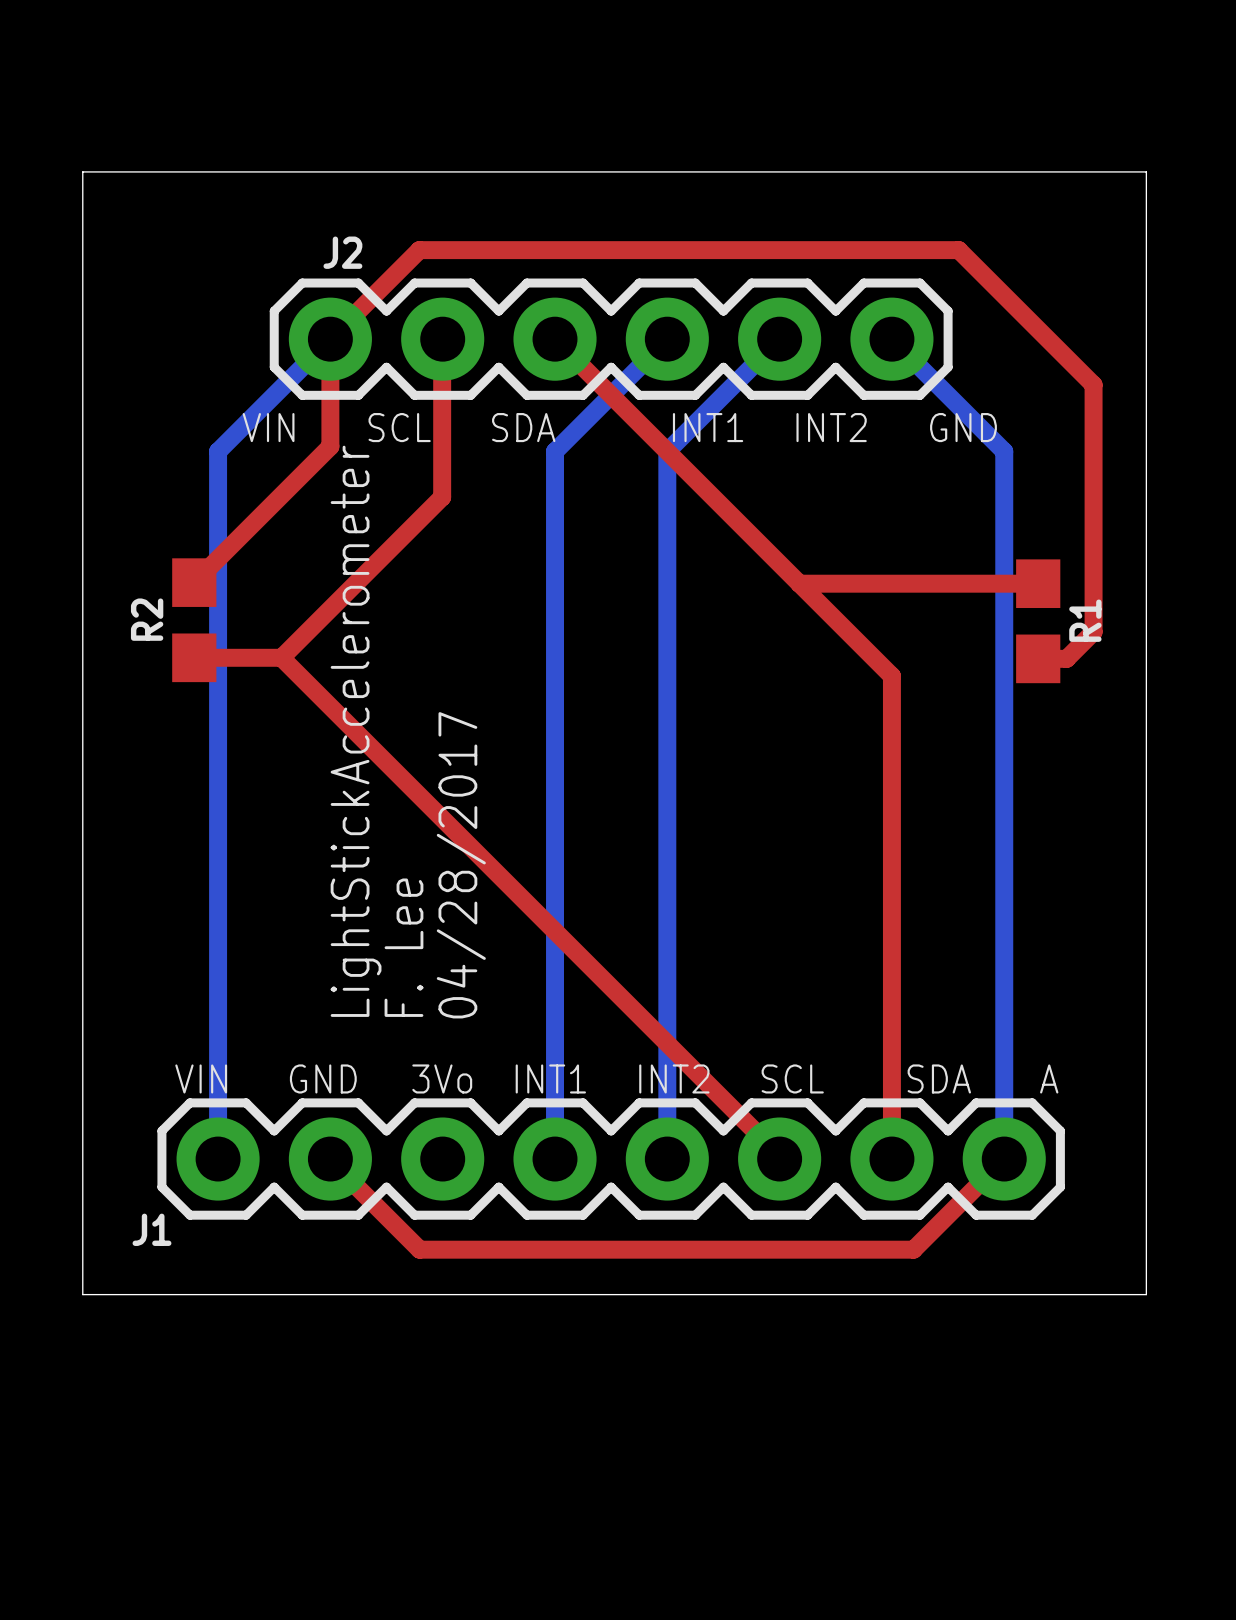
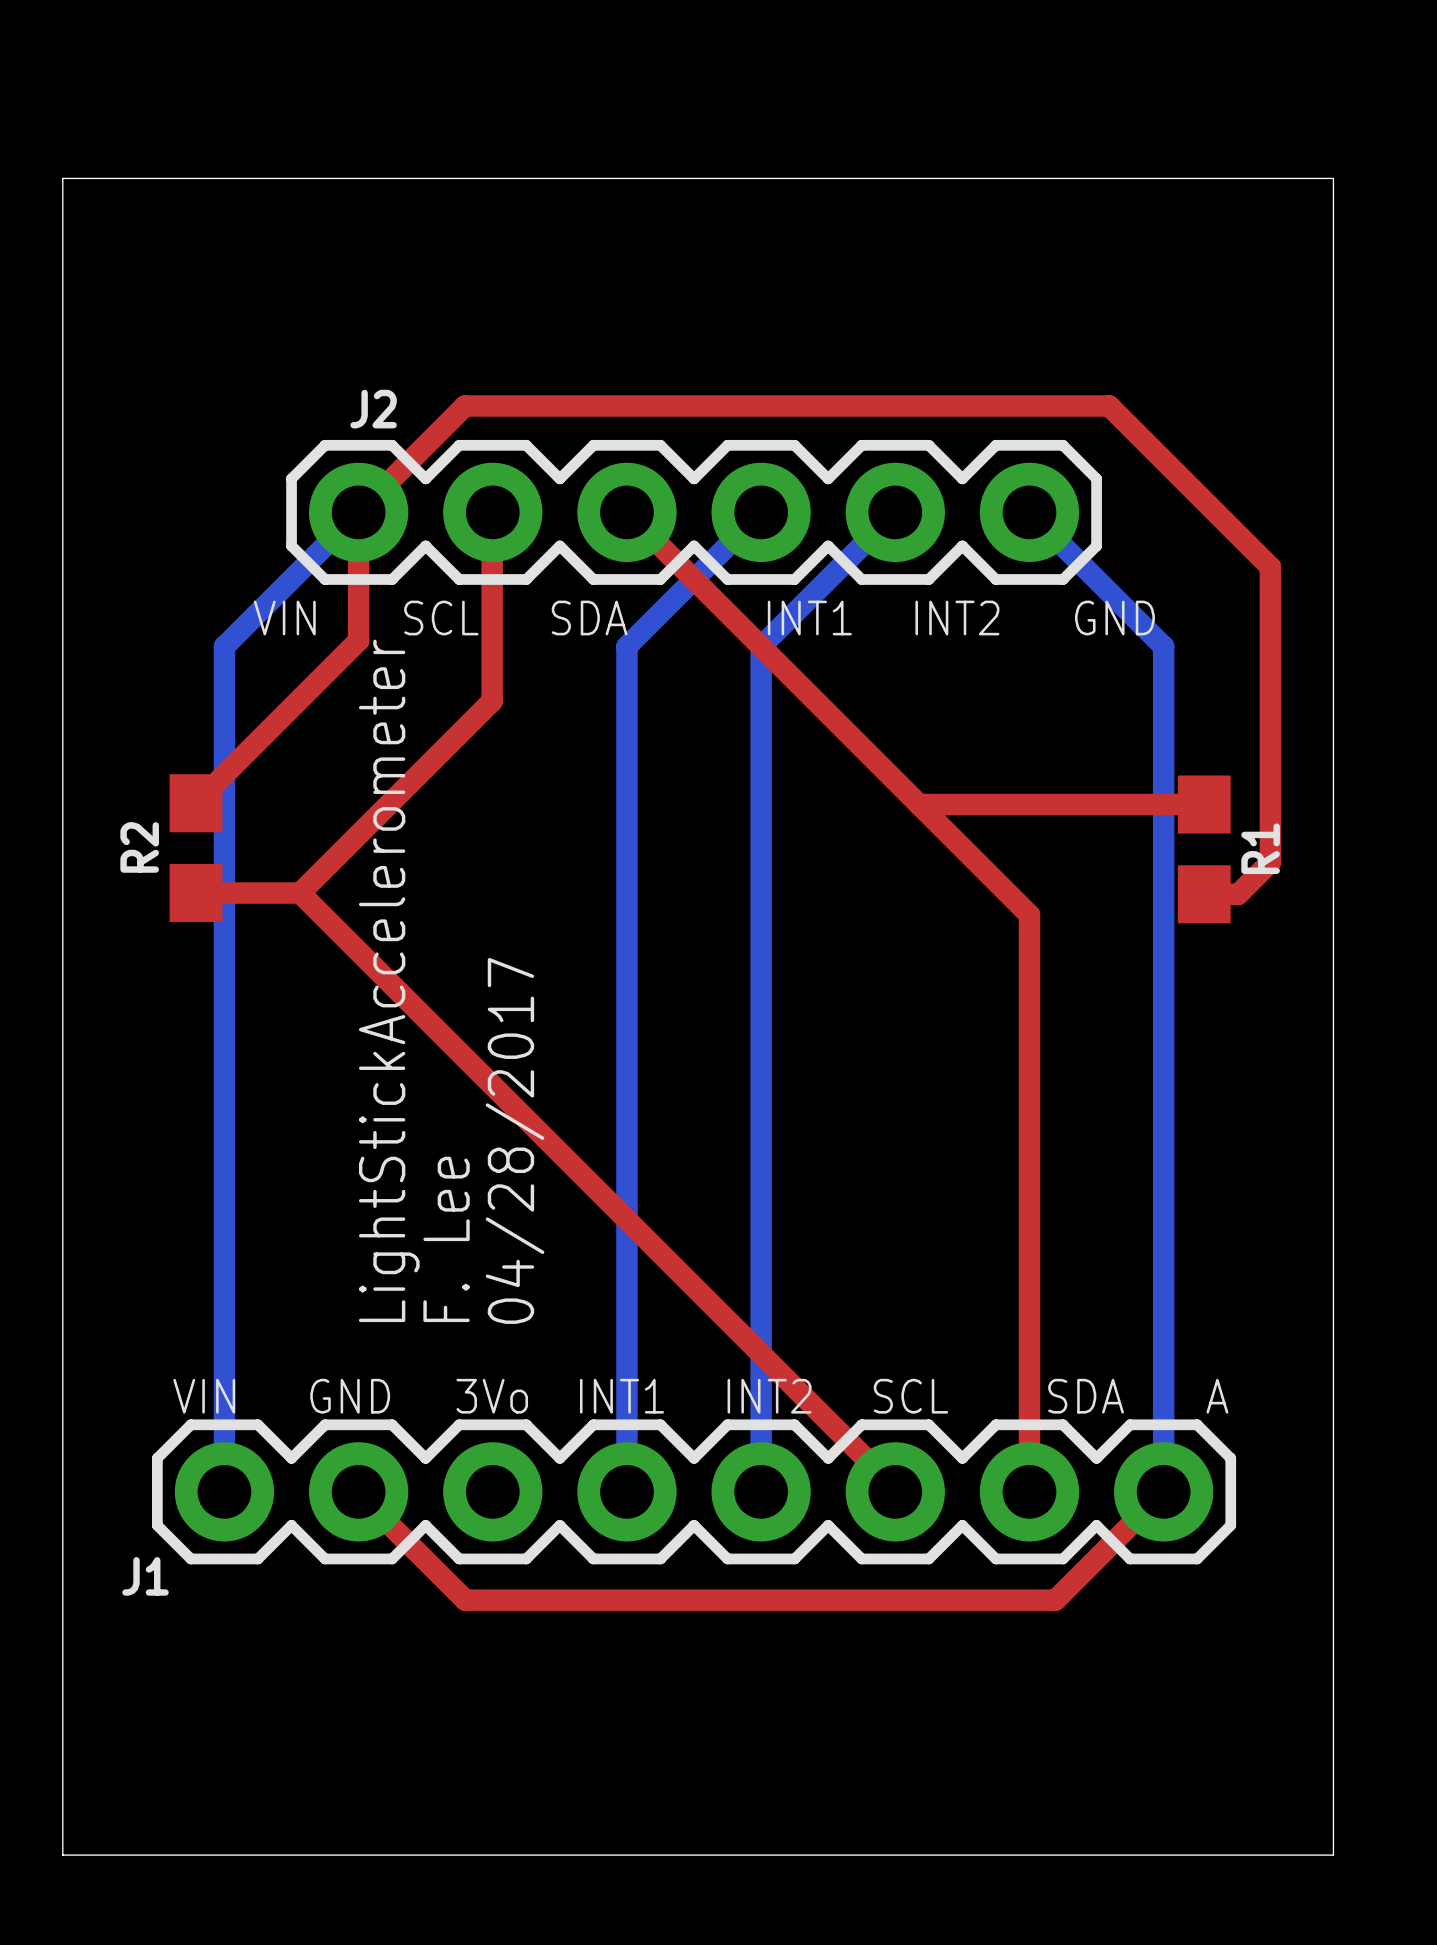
board edge: (82, 171) (1146, 171) -> (62, 312) (62, 178) (1333, 178) (1333, 312)
board edge: (82, 1294) (1146, 1294) -> (62, 1653) (62, 1855) (1333, 1855) (1333, 1653)

